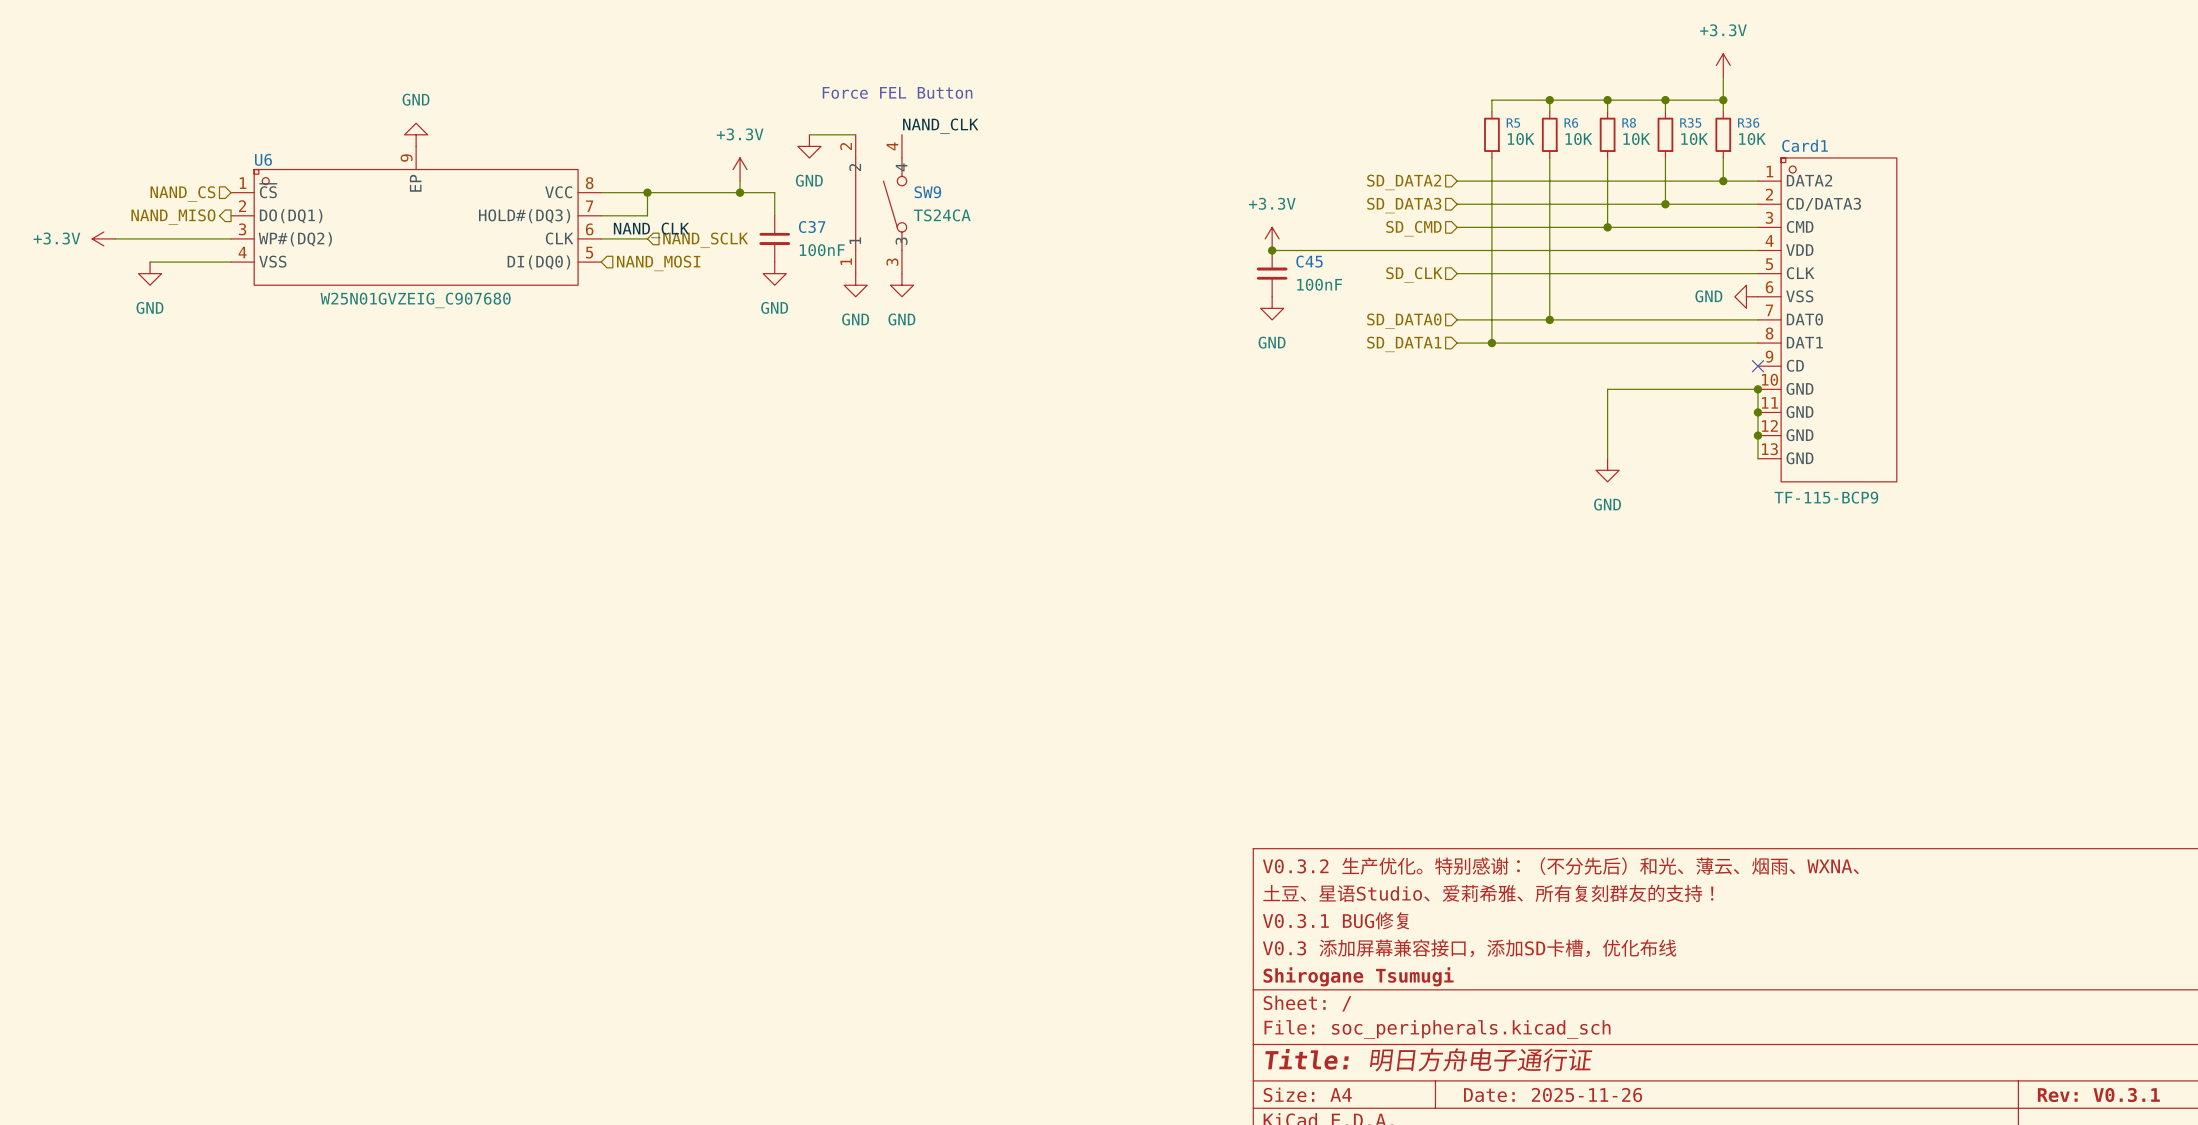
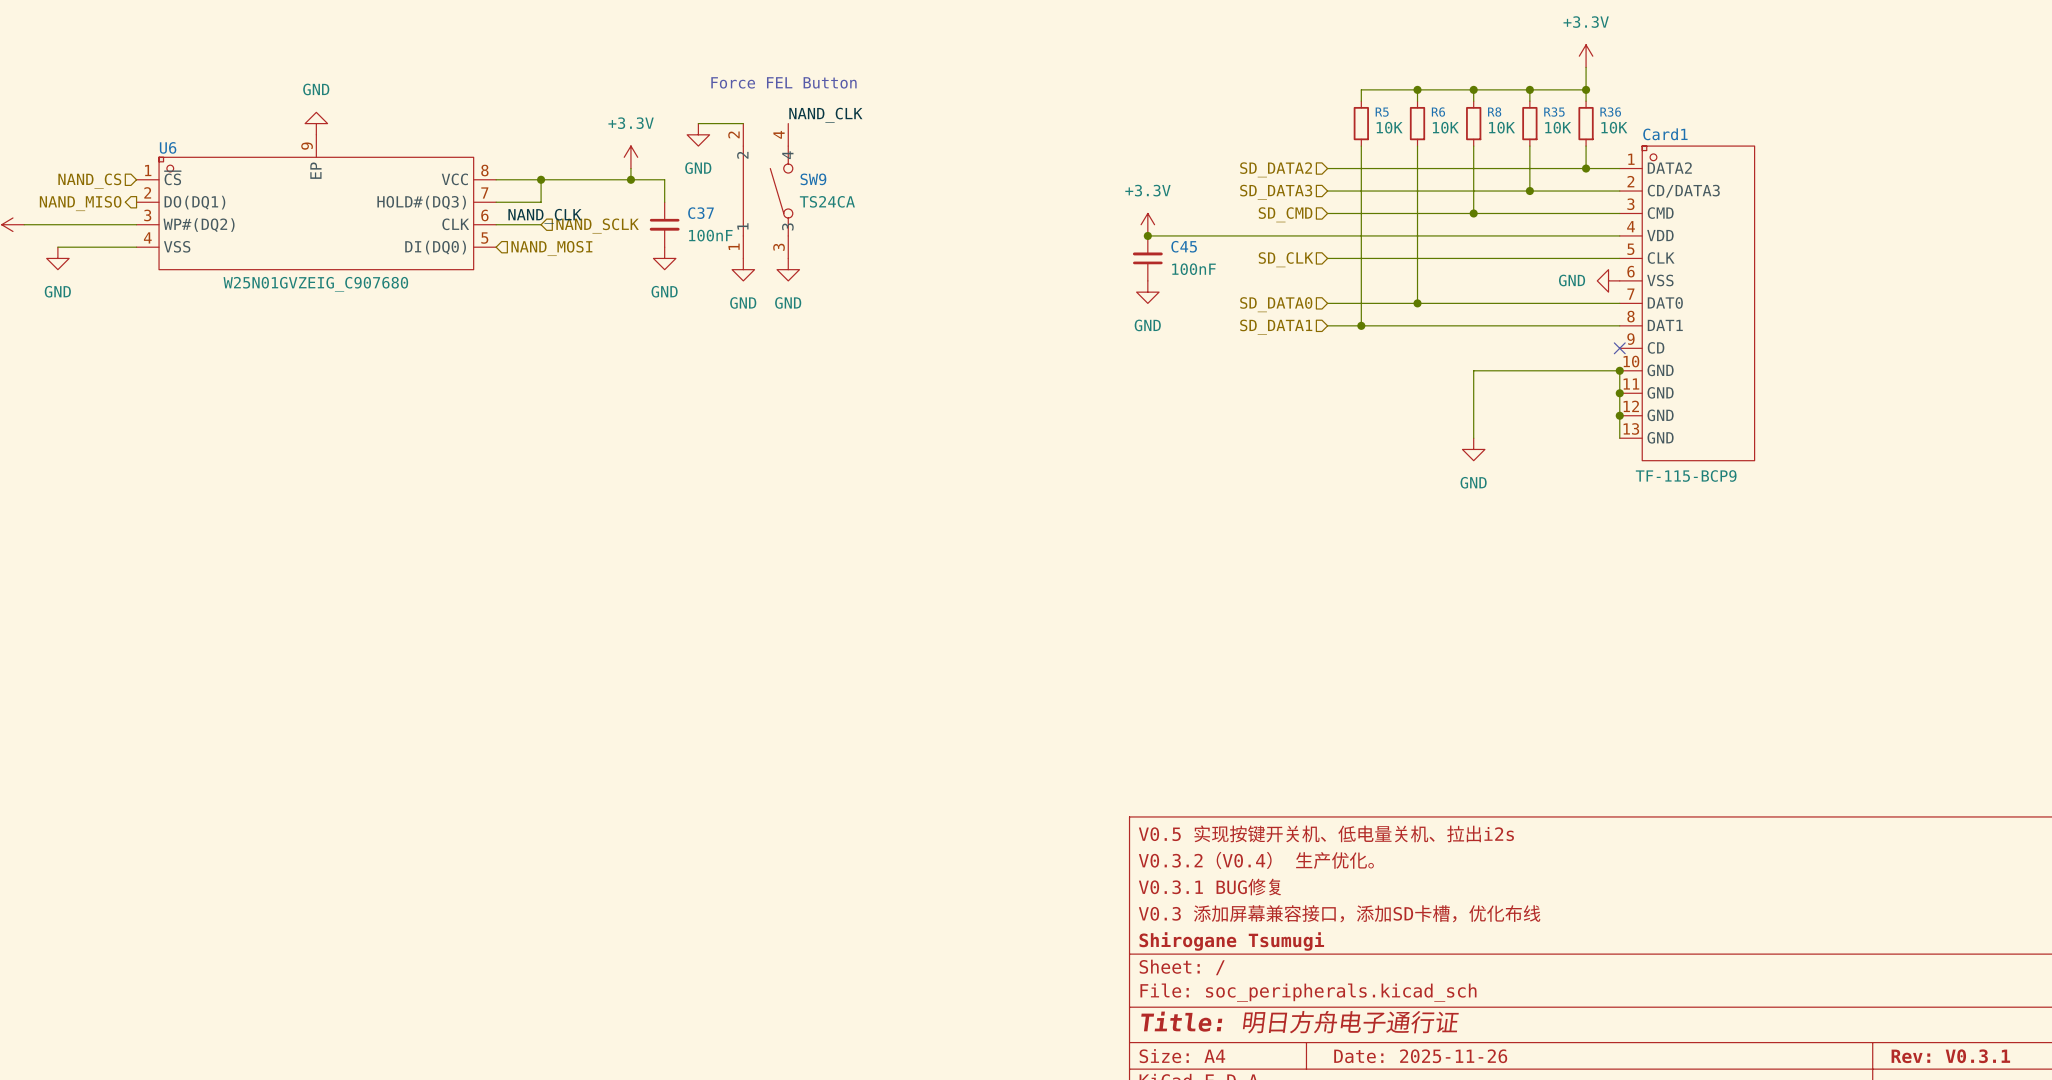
title block: V0.3.2 生产优化。特别感谢：（不分先后）和光、薄云、烟雨、WXNA、 (1560, 866) -> V0.5 实现按键开关机、低电量关机、拉出i2s (1326, 833)
title block: 土豆、星语Studio、爱莉希雅、所有复刻群友的支持！ (1488, 893) -> V0.3.2（V0.4） 生产优化。 (1256, 860)

